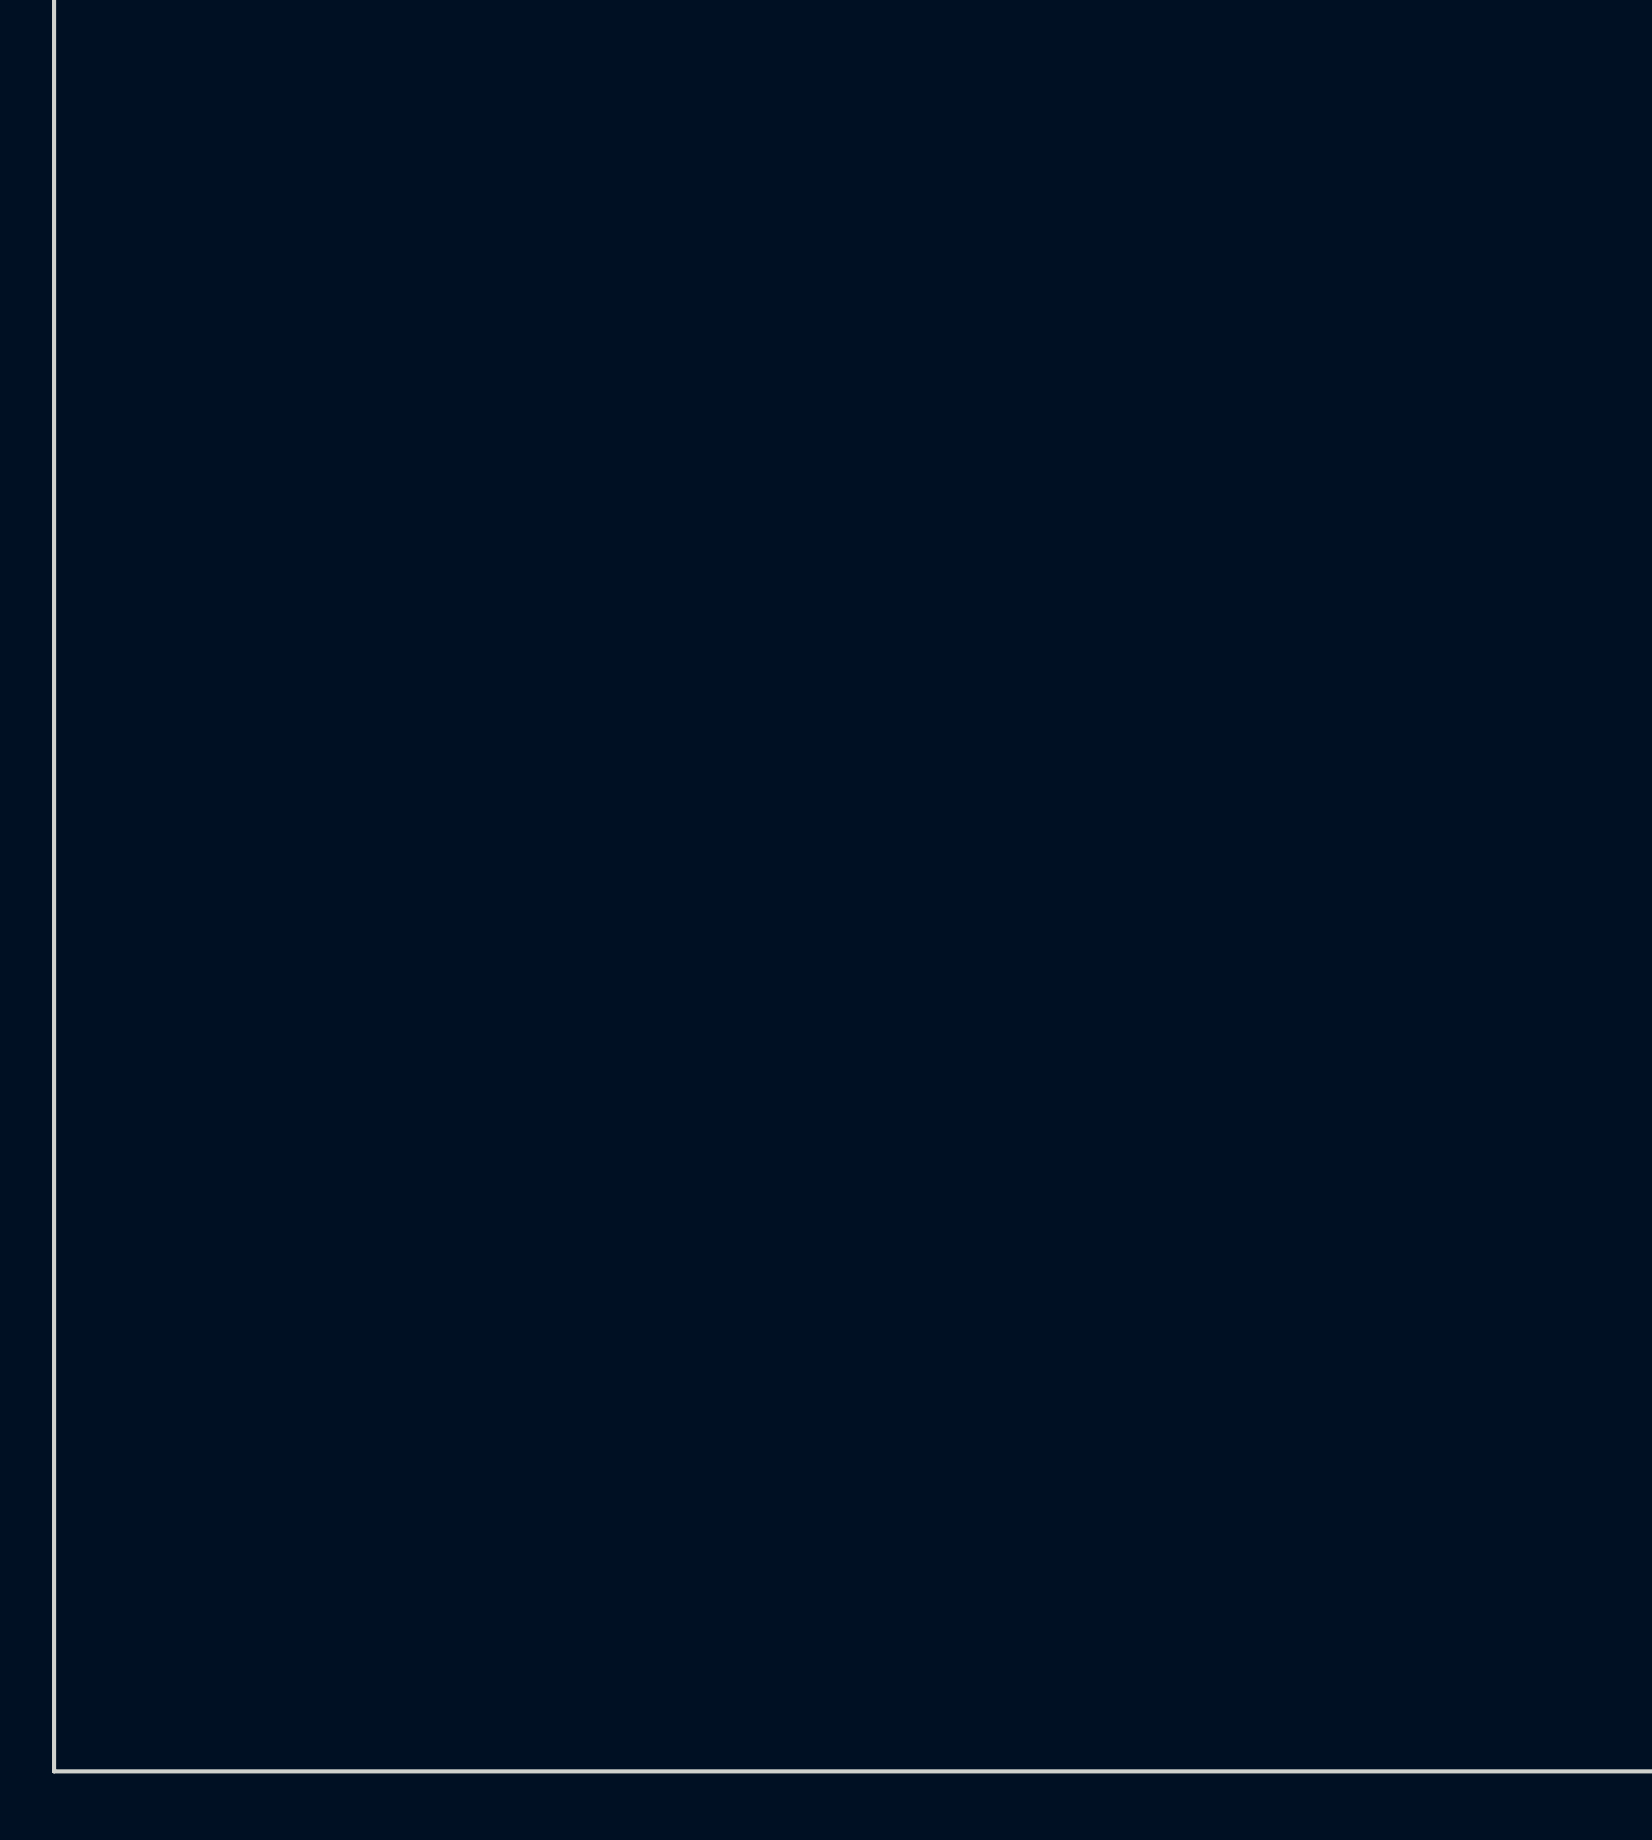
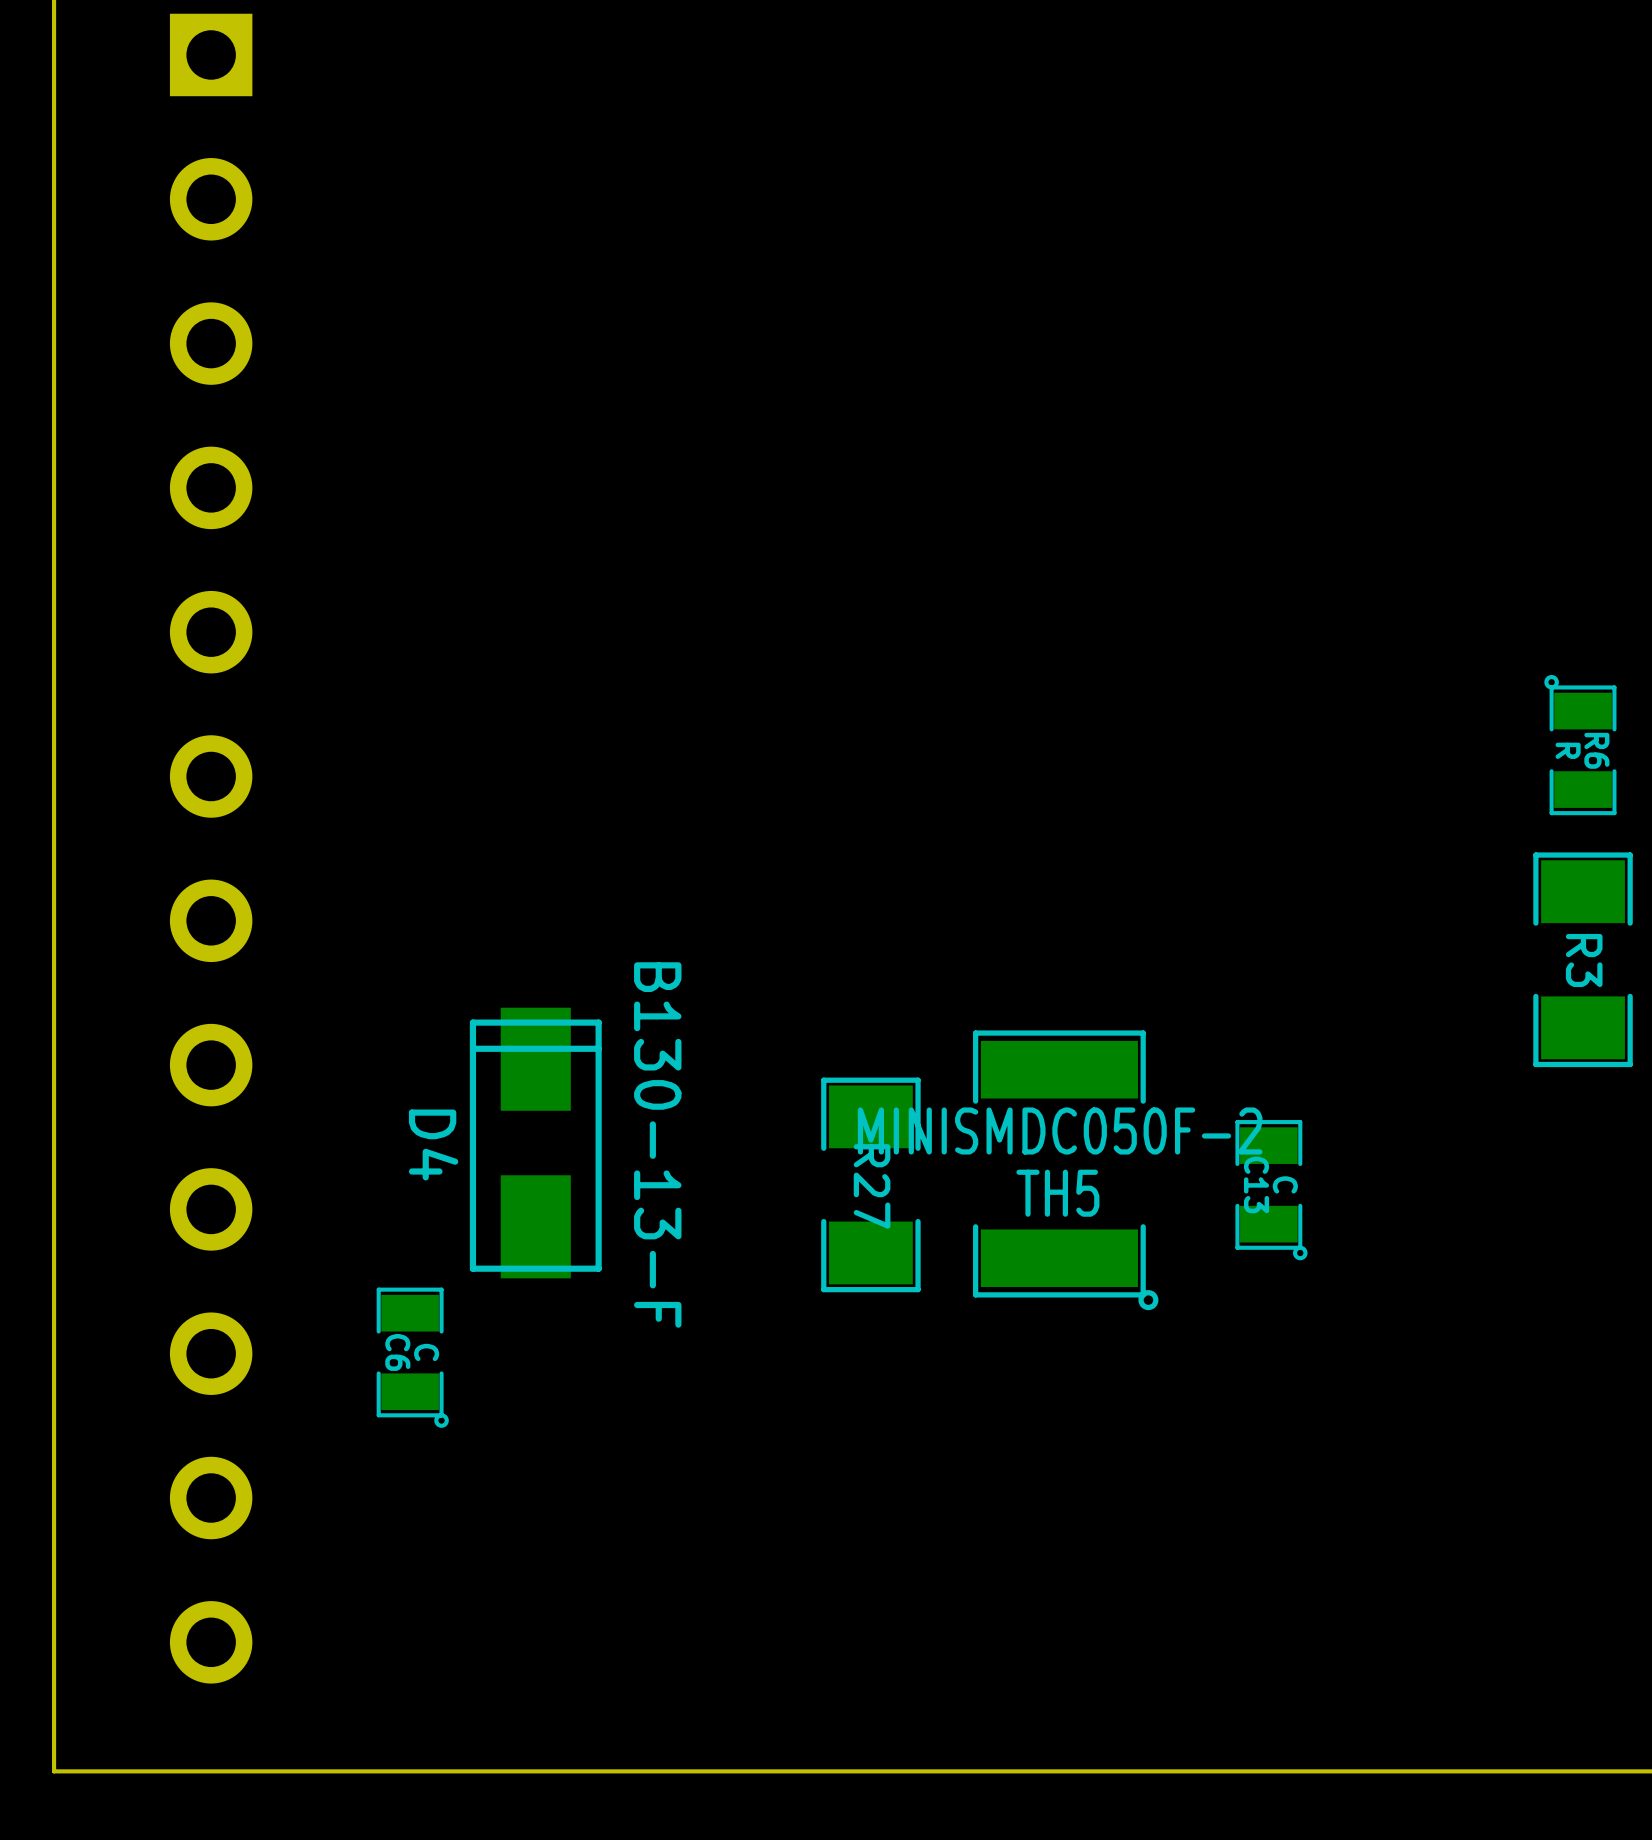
R6: none -> R (1580, 745)
part: none -> (211, 848)
R3: none -> (1583, 959)
D4: none -> B130-13-F (535, 1143)
TH5: none -> MINISMDC050F-2 (1065, 1170)
R27: none -> (870, 1184)
C13: none -> C (1271, 1190)
C6: none -> C (412, 1357)

